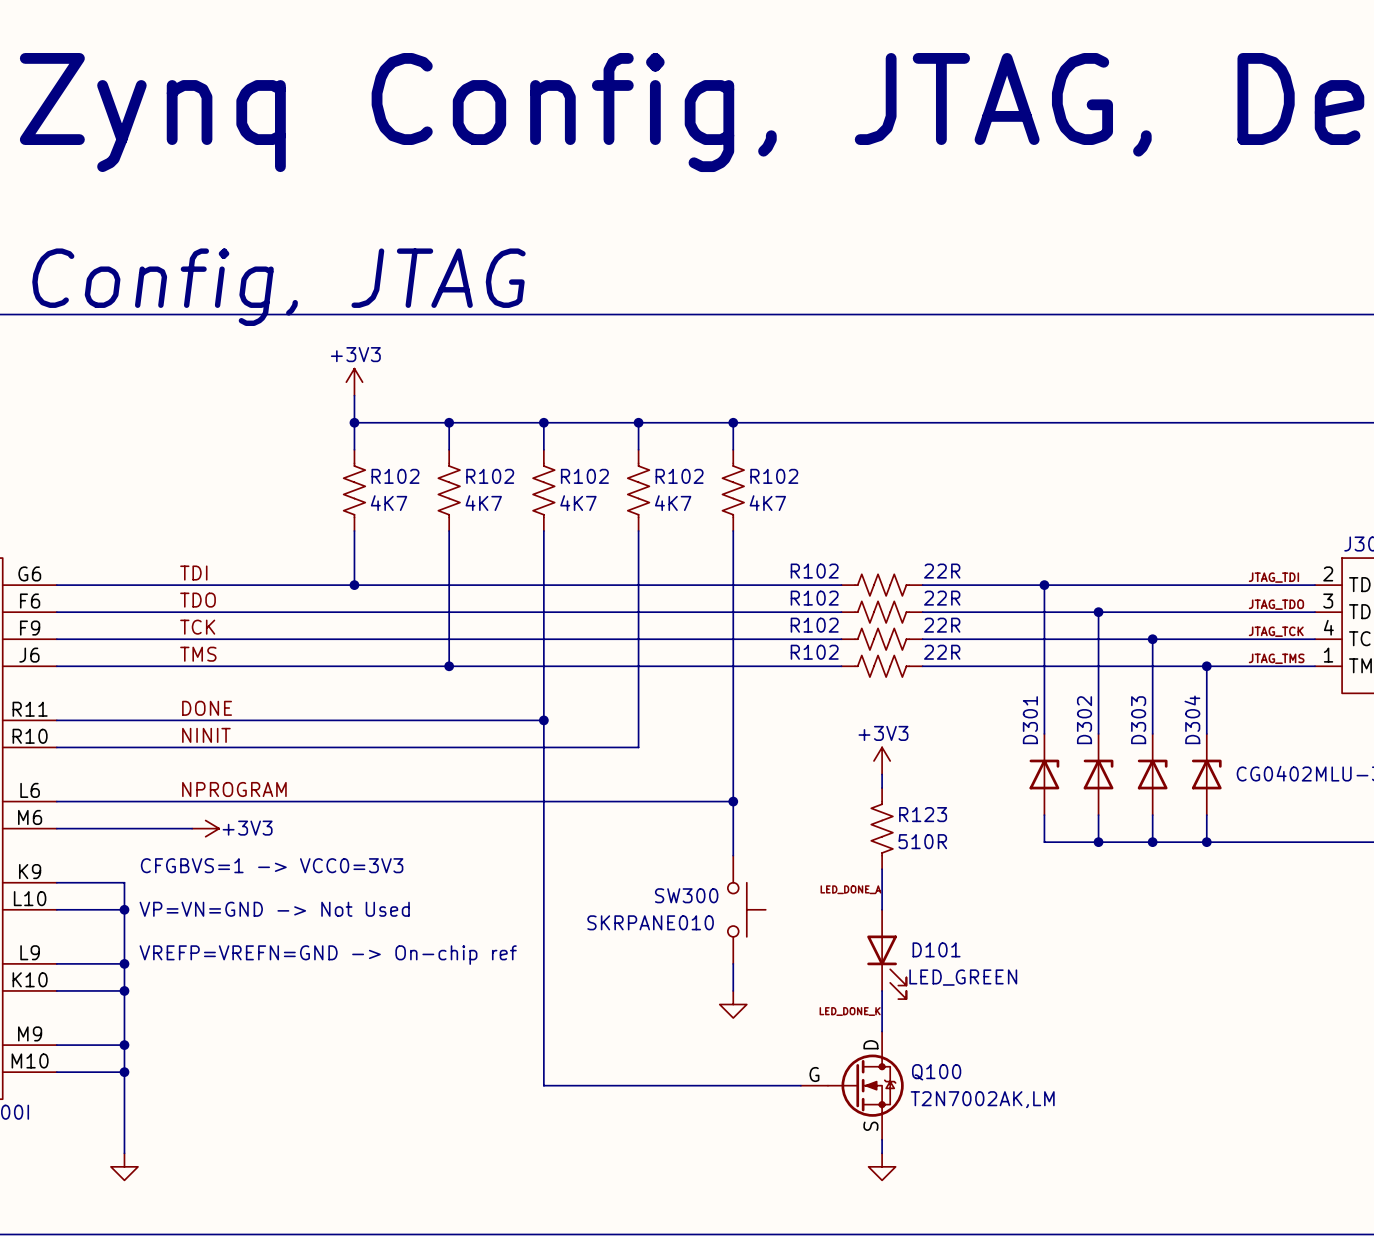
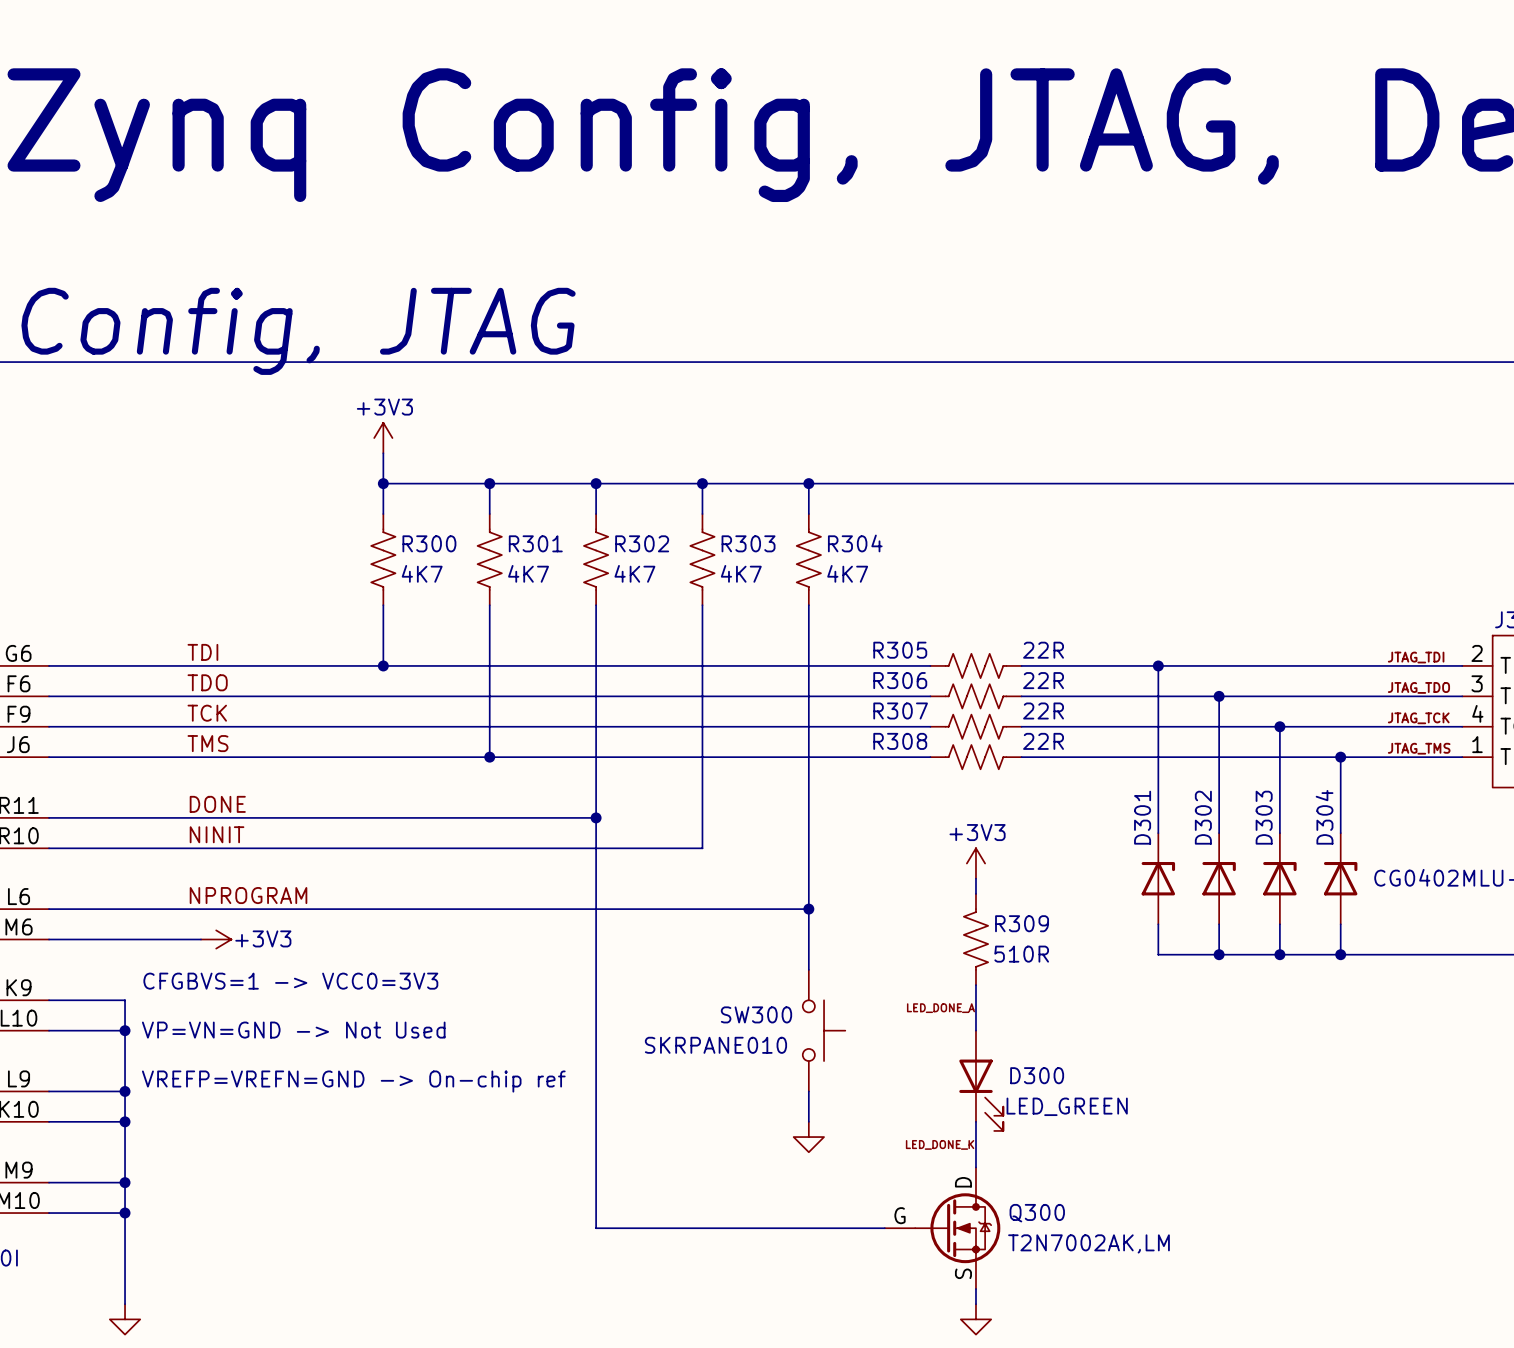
R102 name: R102 (395, 476) -> R300 (429, 543)
R102 name: R102 (490, 476) -> R301 (535, 543)
R102 name: R102 (584, 476) -> R302 (642, 543)
R102 name: R102 (679, 476) -> R303 (748, 543)
R102 name: R102 (774, 476) -> R304 (855, 543)
R102 name: R102 (814, 571) -> R305 (900, 650)
R102 name: R102 (814, 598) -> R306 (900, 680)
R102 name: R102 (814, 625) -> R307 (900, 710)
R102 name: R102 (814, 652) -> R308 (900, 741)
R123 name: R123 (923, 814) -> R309 (1022, 923)
D101 name: D101 (936, 949) -> D300 (1037, 1075)
Q100 name: Q100 (936, 1072) -> Q300 (1037, 1213)

